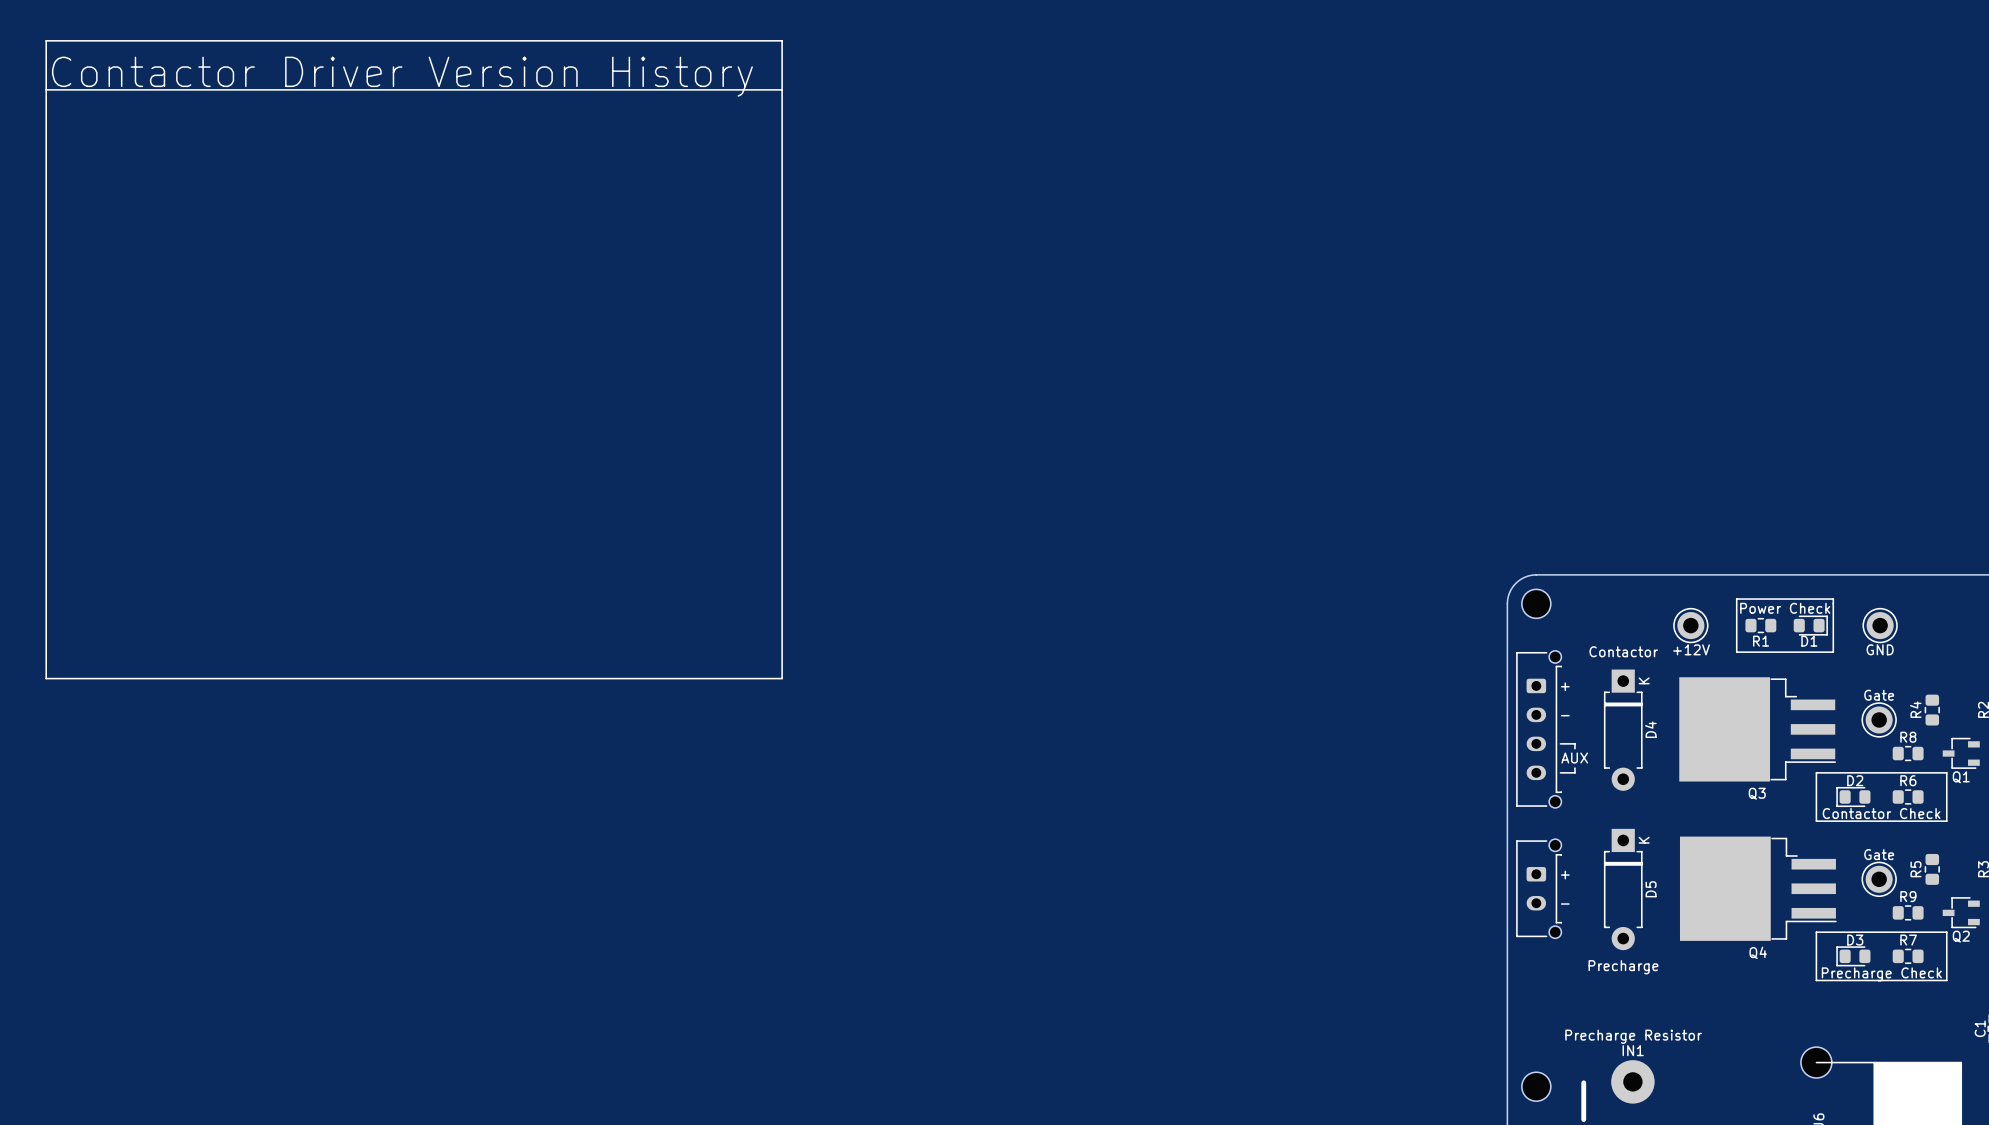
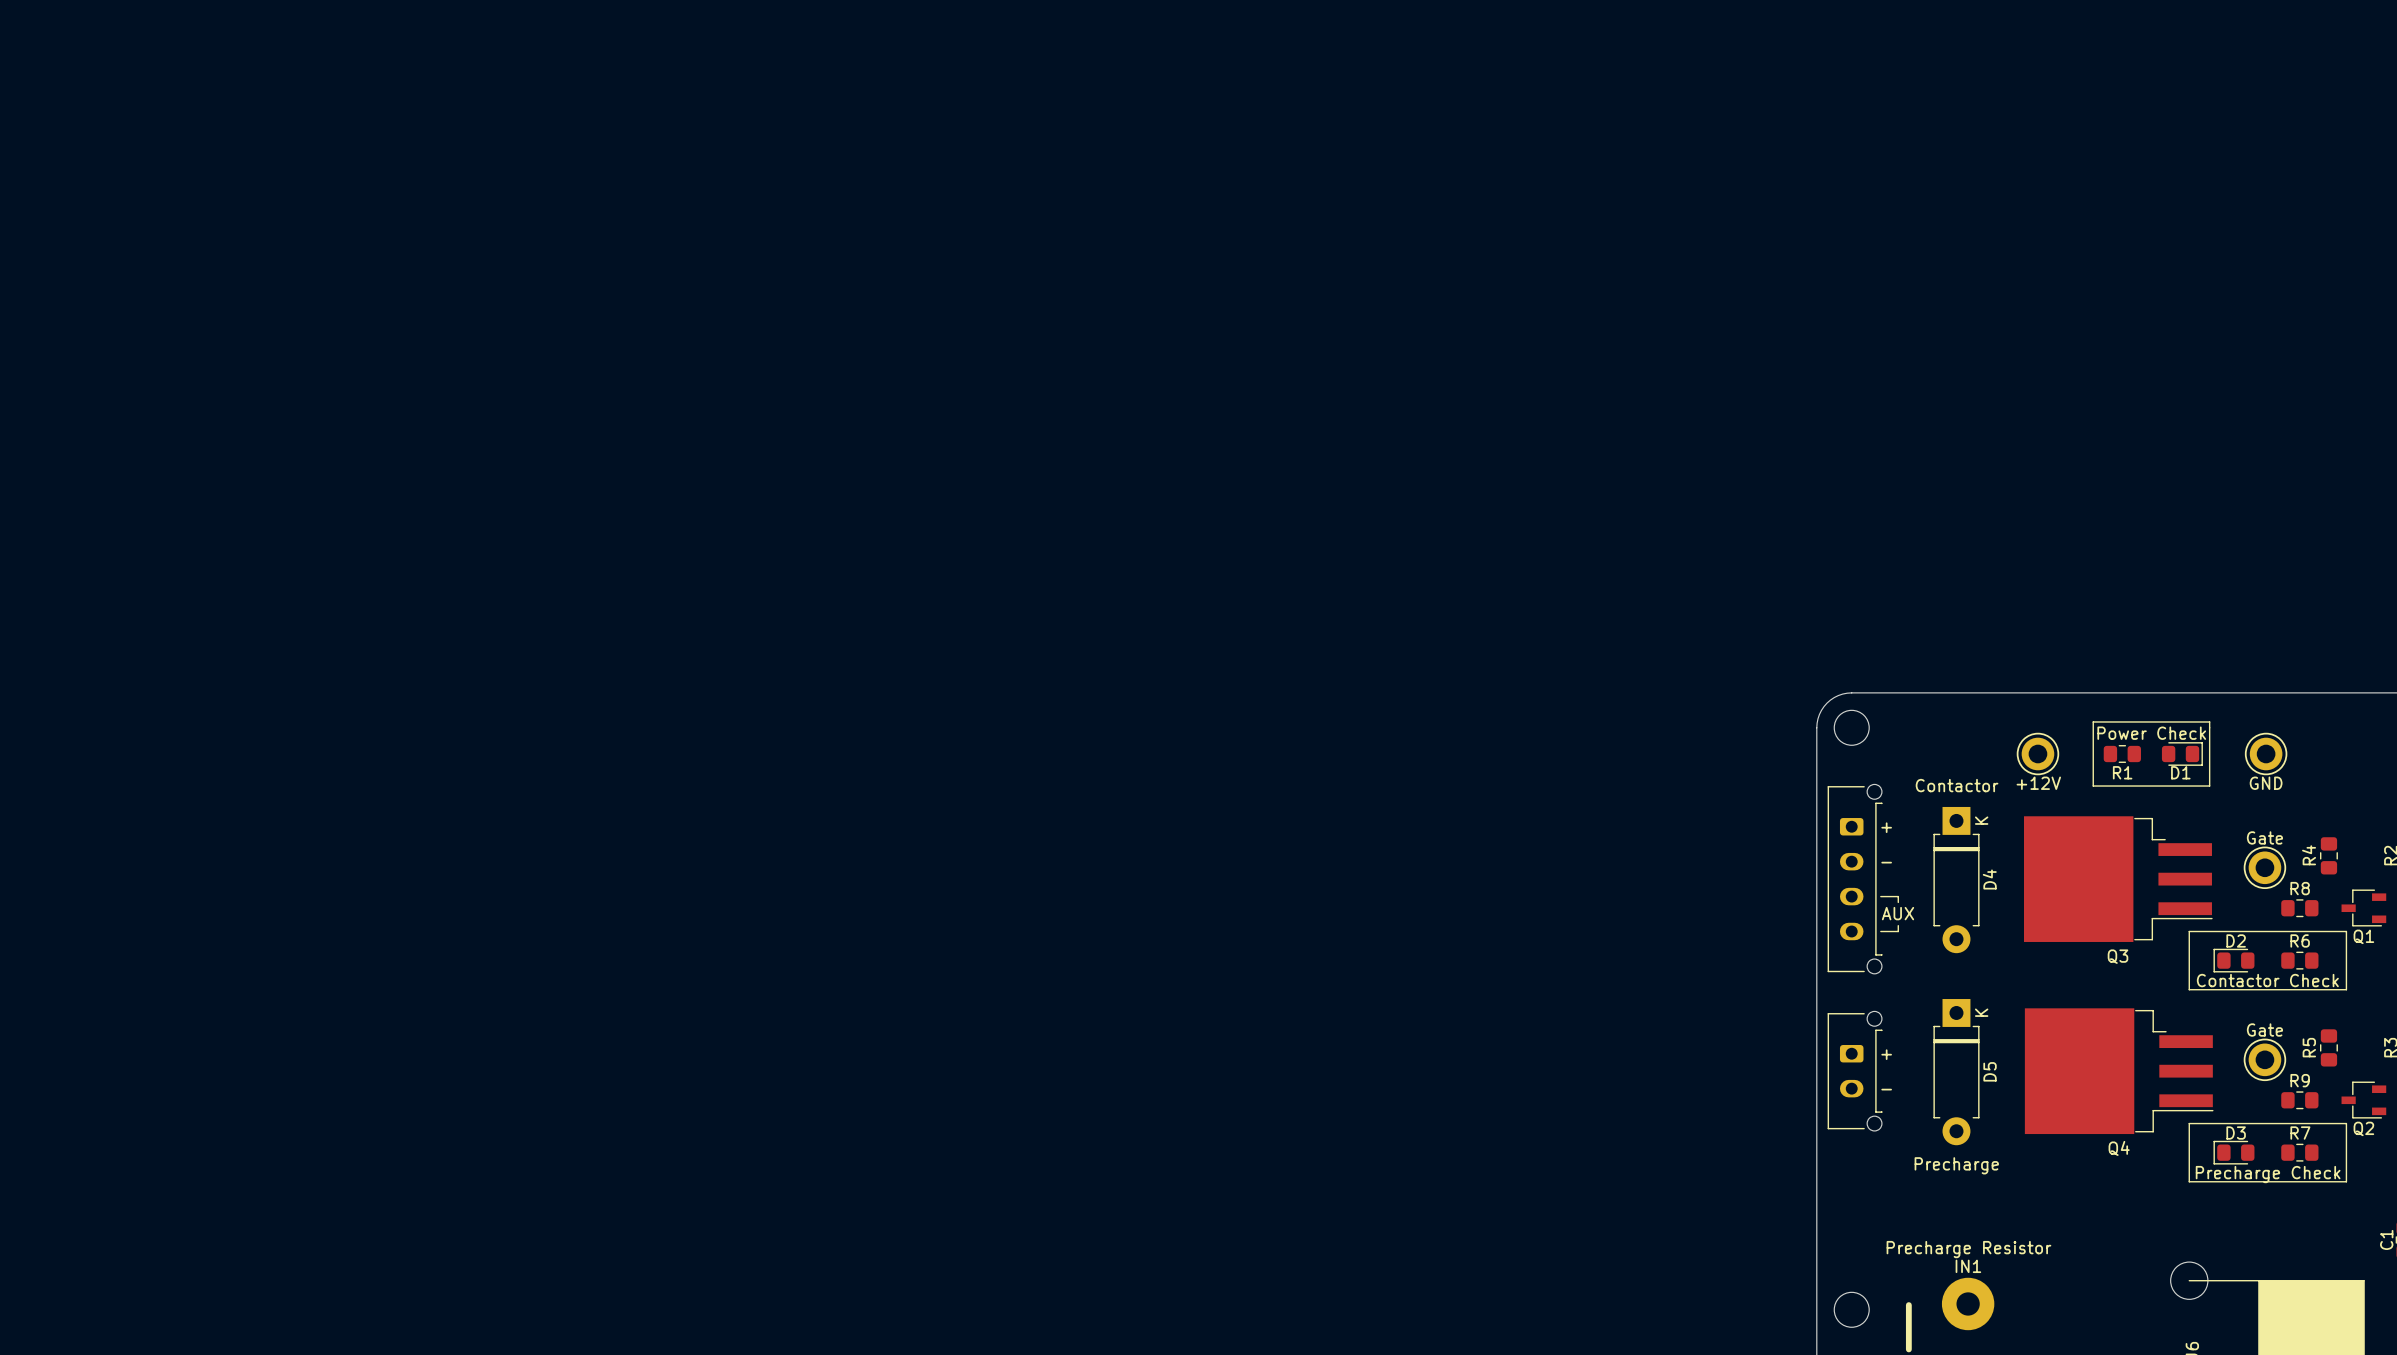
line: (46, 40) (782, 40) (782, 678) (46, 678) (46, 40) -> none
text: Contactor Driver Version History (402, 76) -> none
line: (46, 89) (782, 89) -> none

